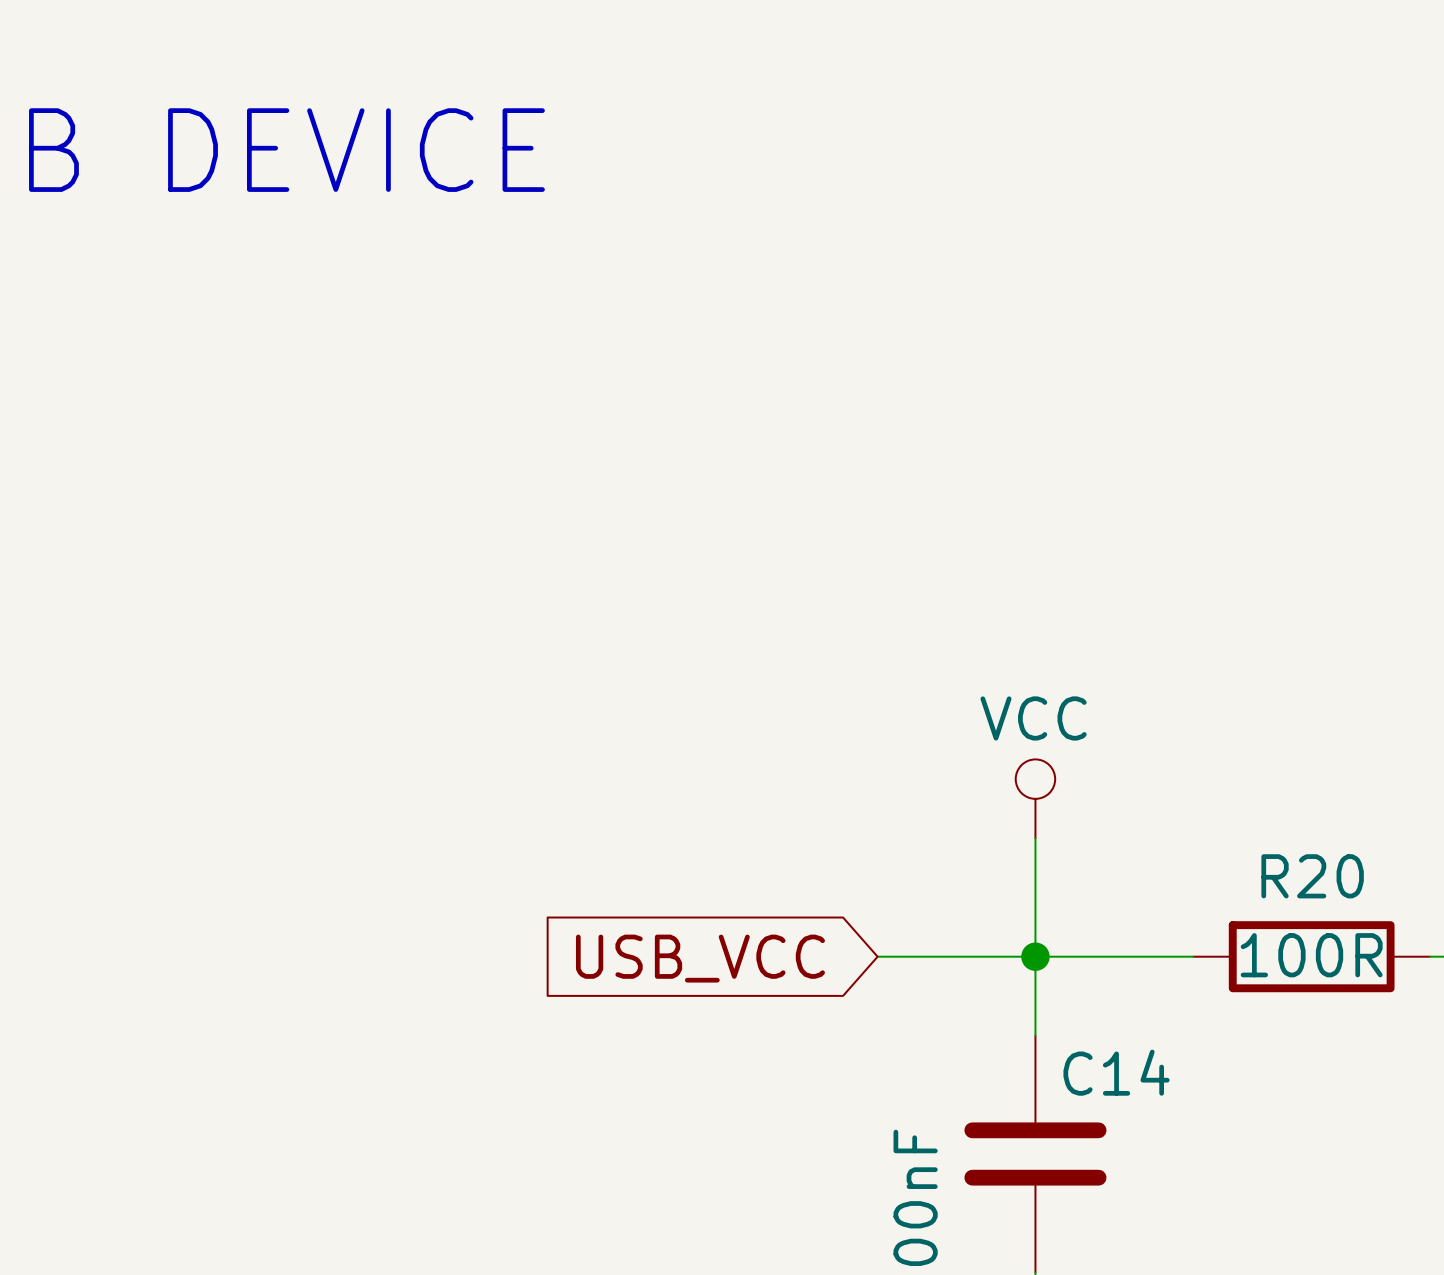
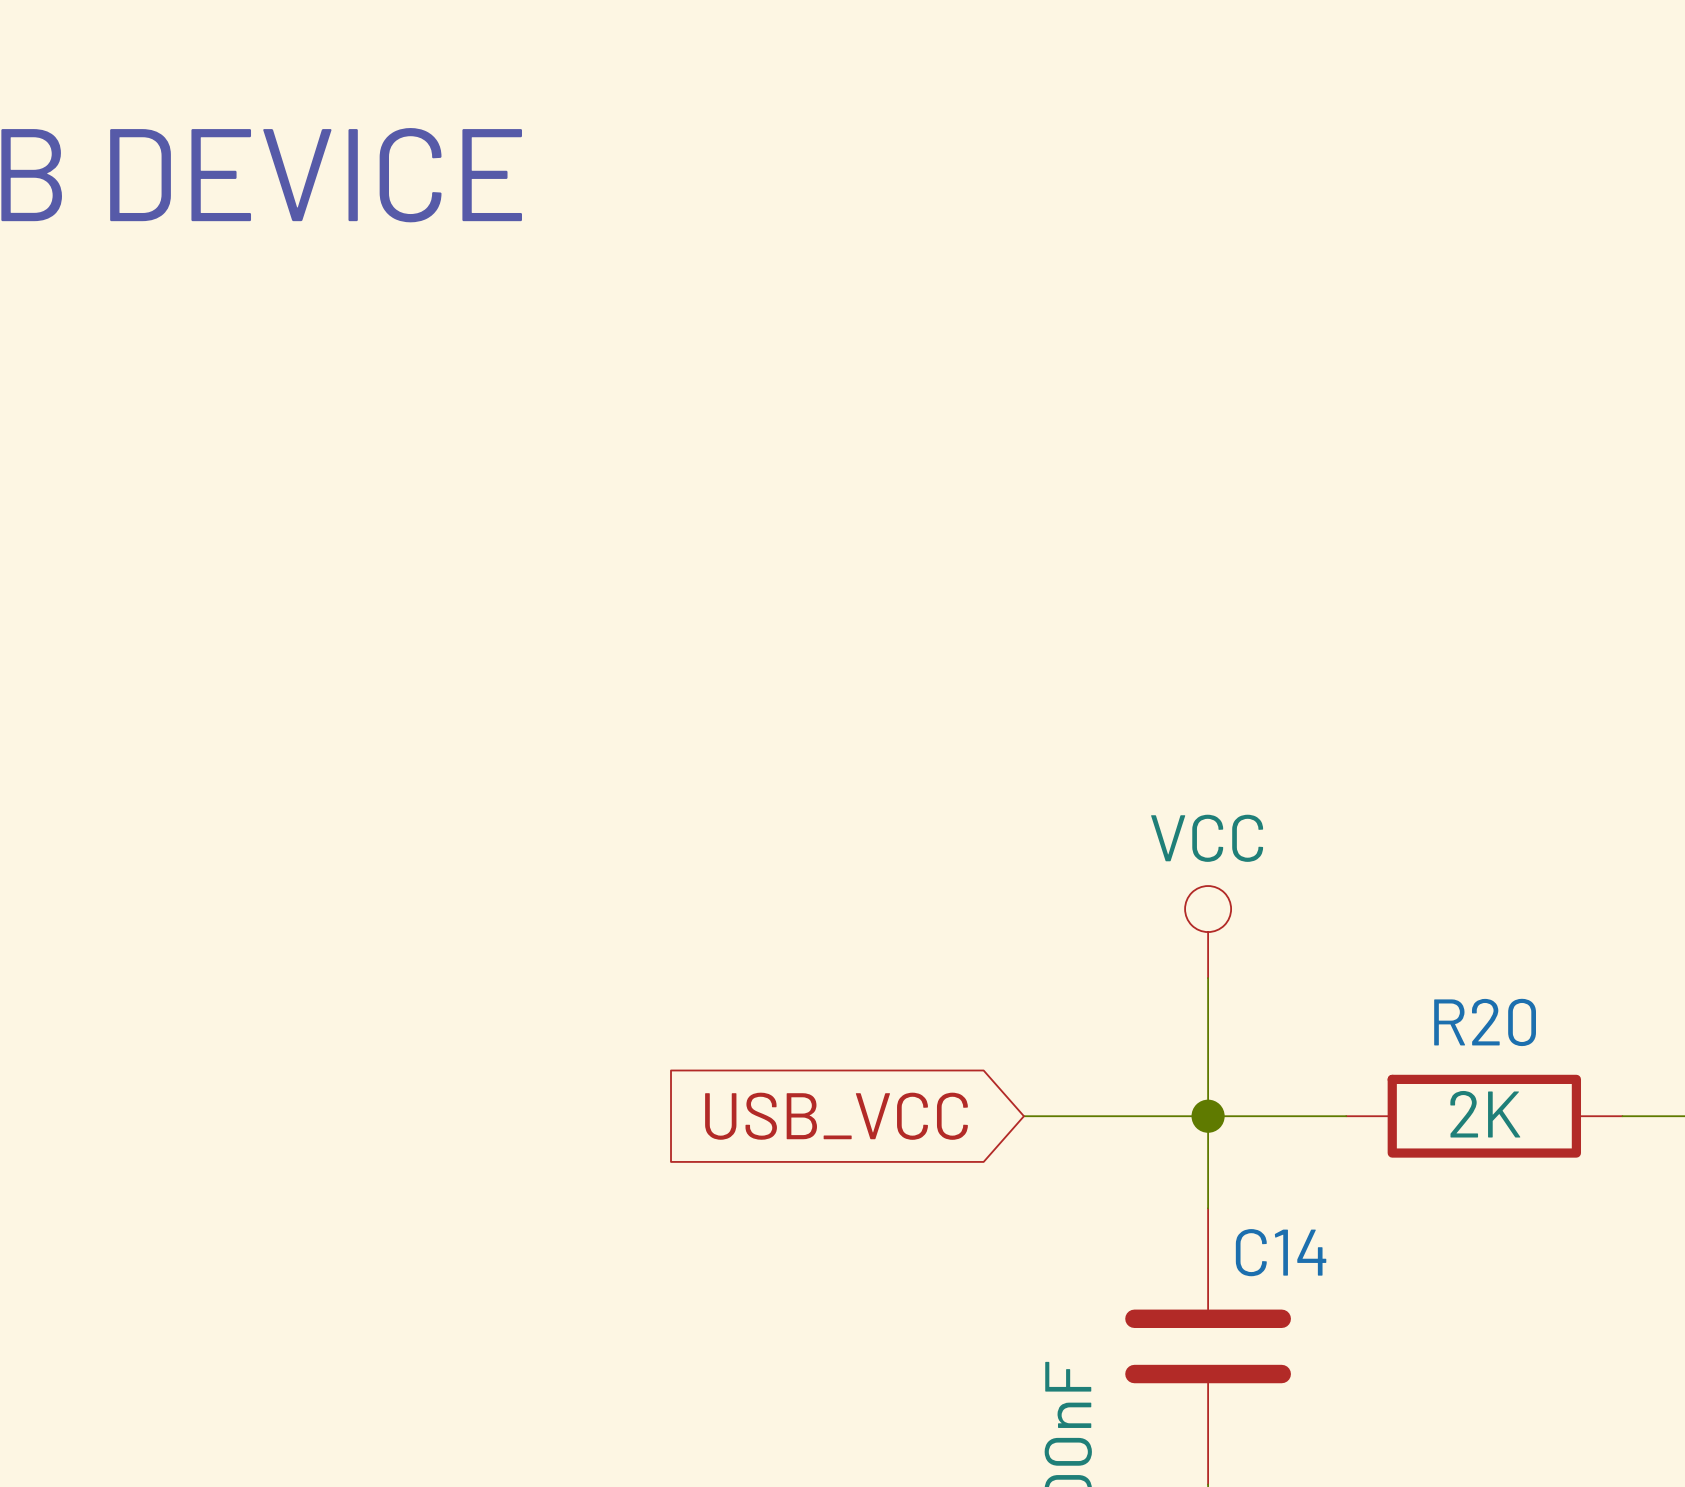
R20 value: 100R (1311, 955) -> 2K (1485, 1114)
R20 position: (1311, 956) -> (1484, 1116)

